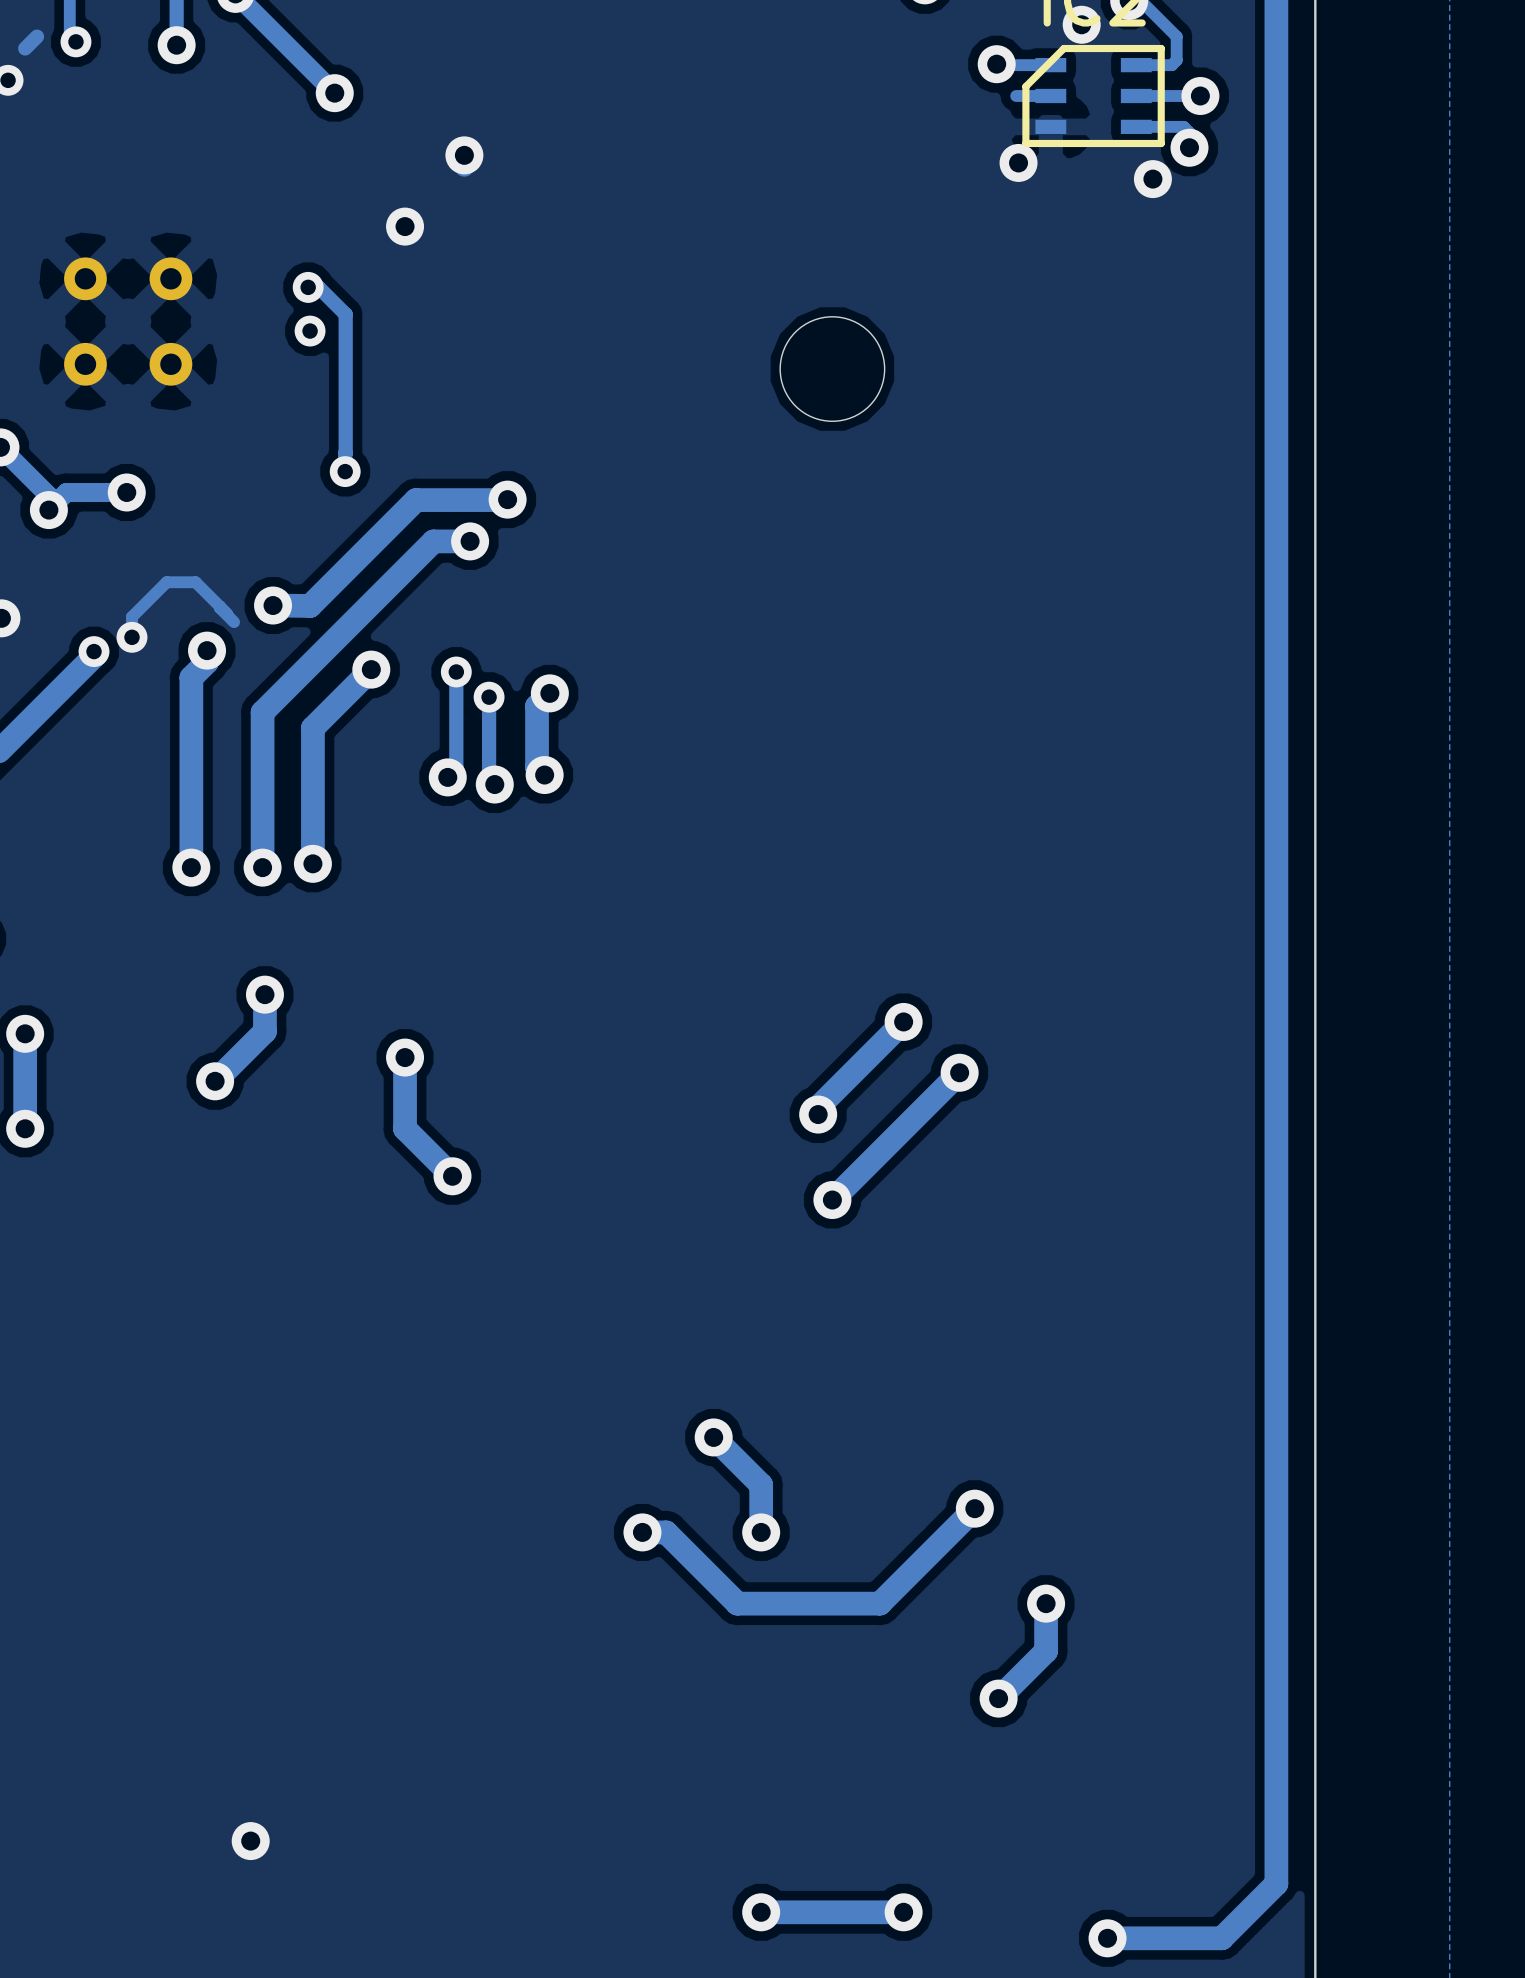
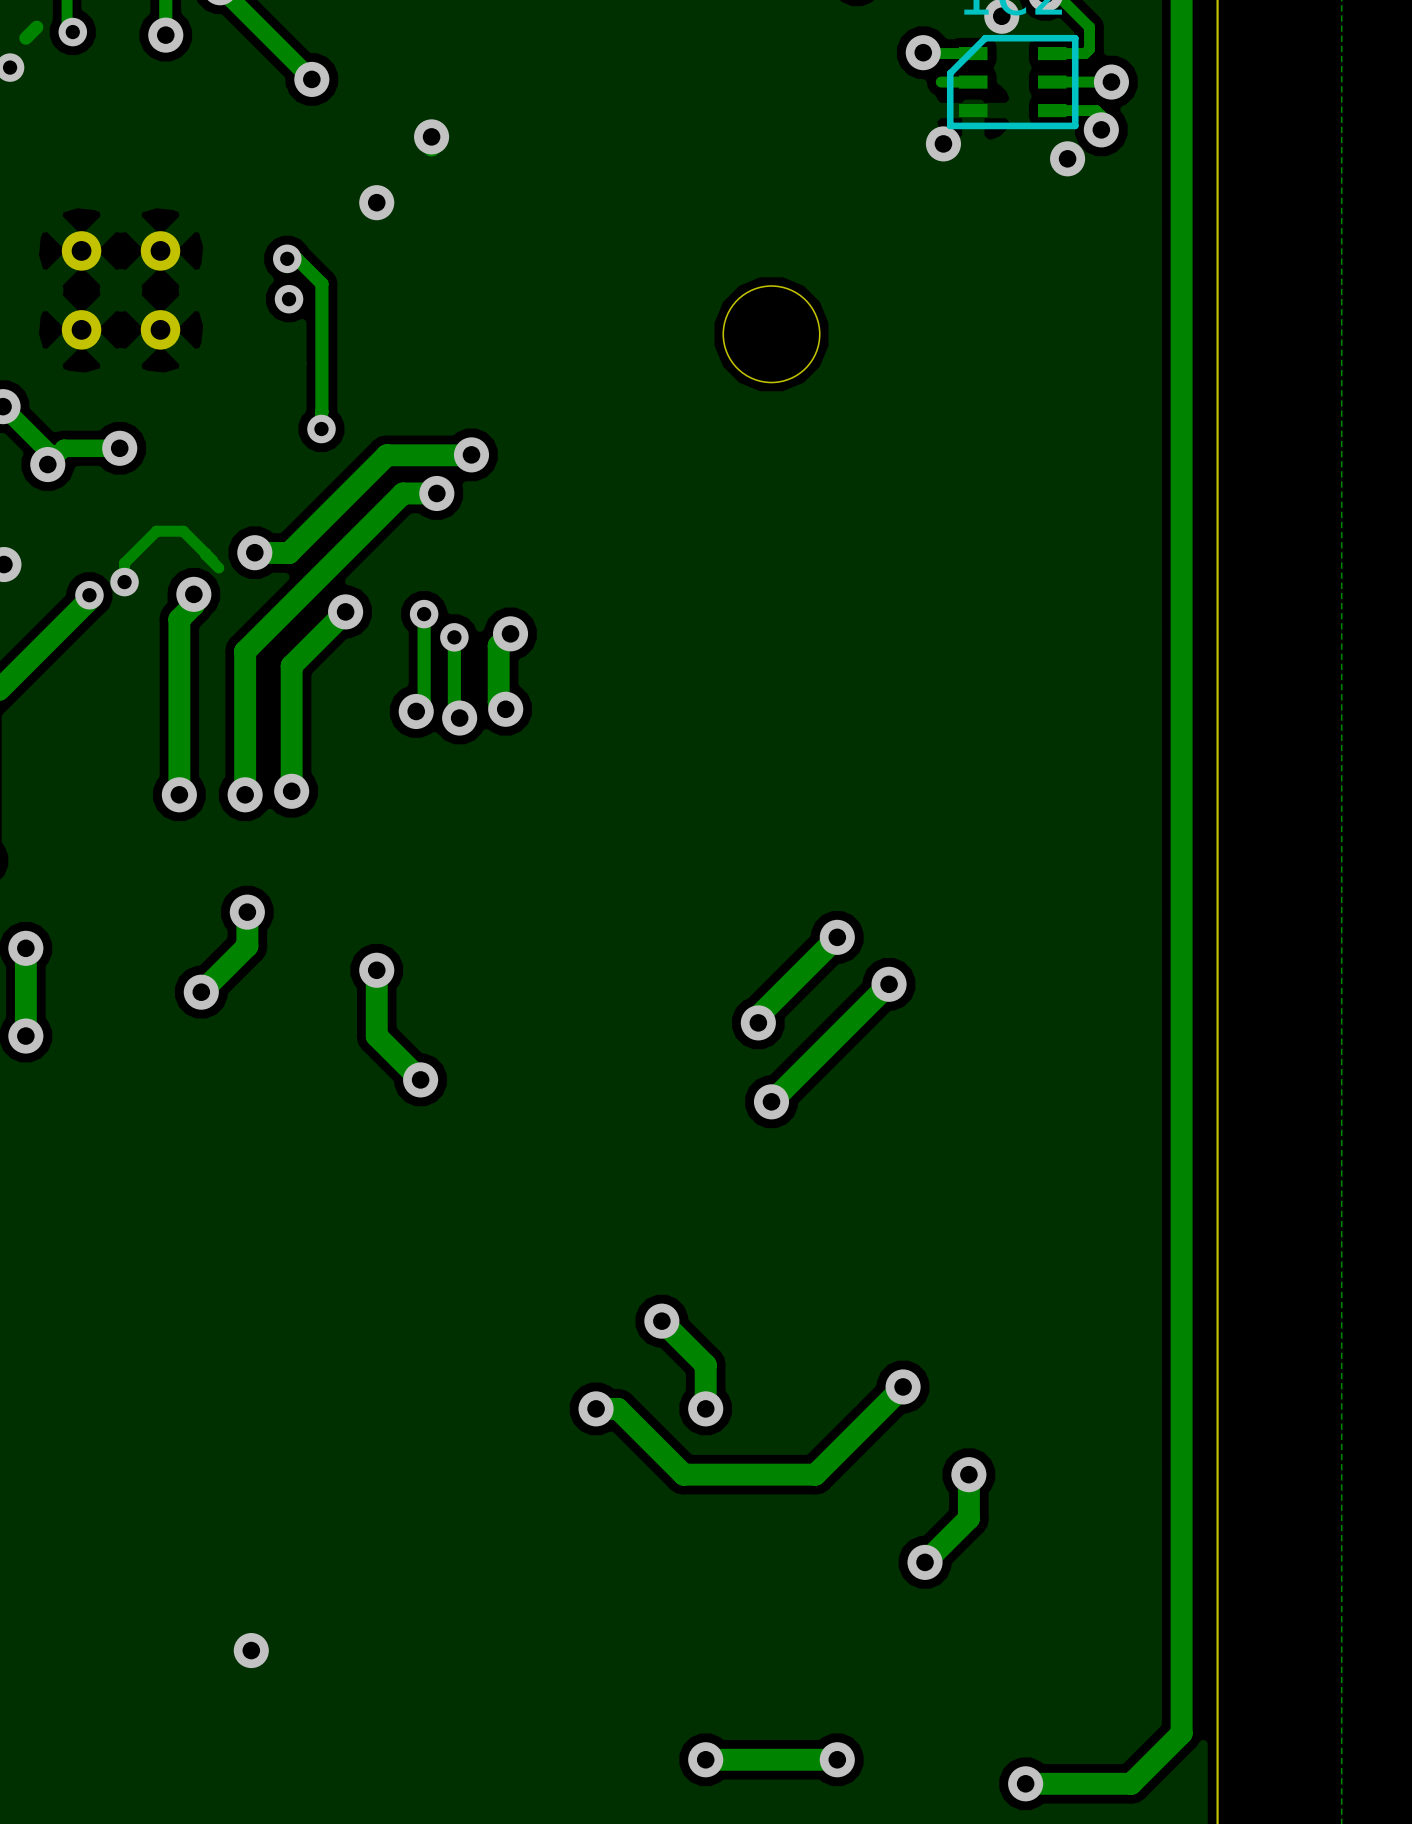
via position: (250, 1841) -> (251, 1650)

